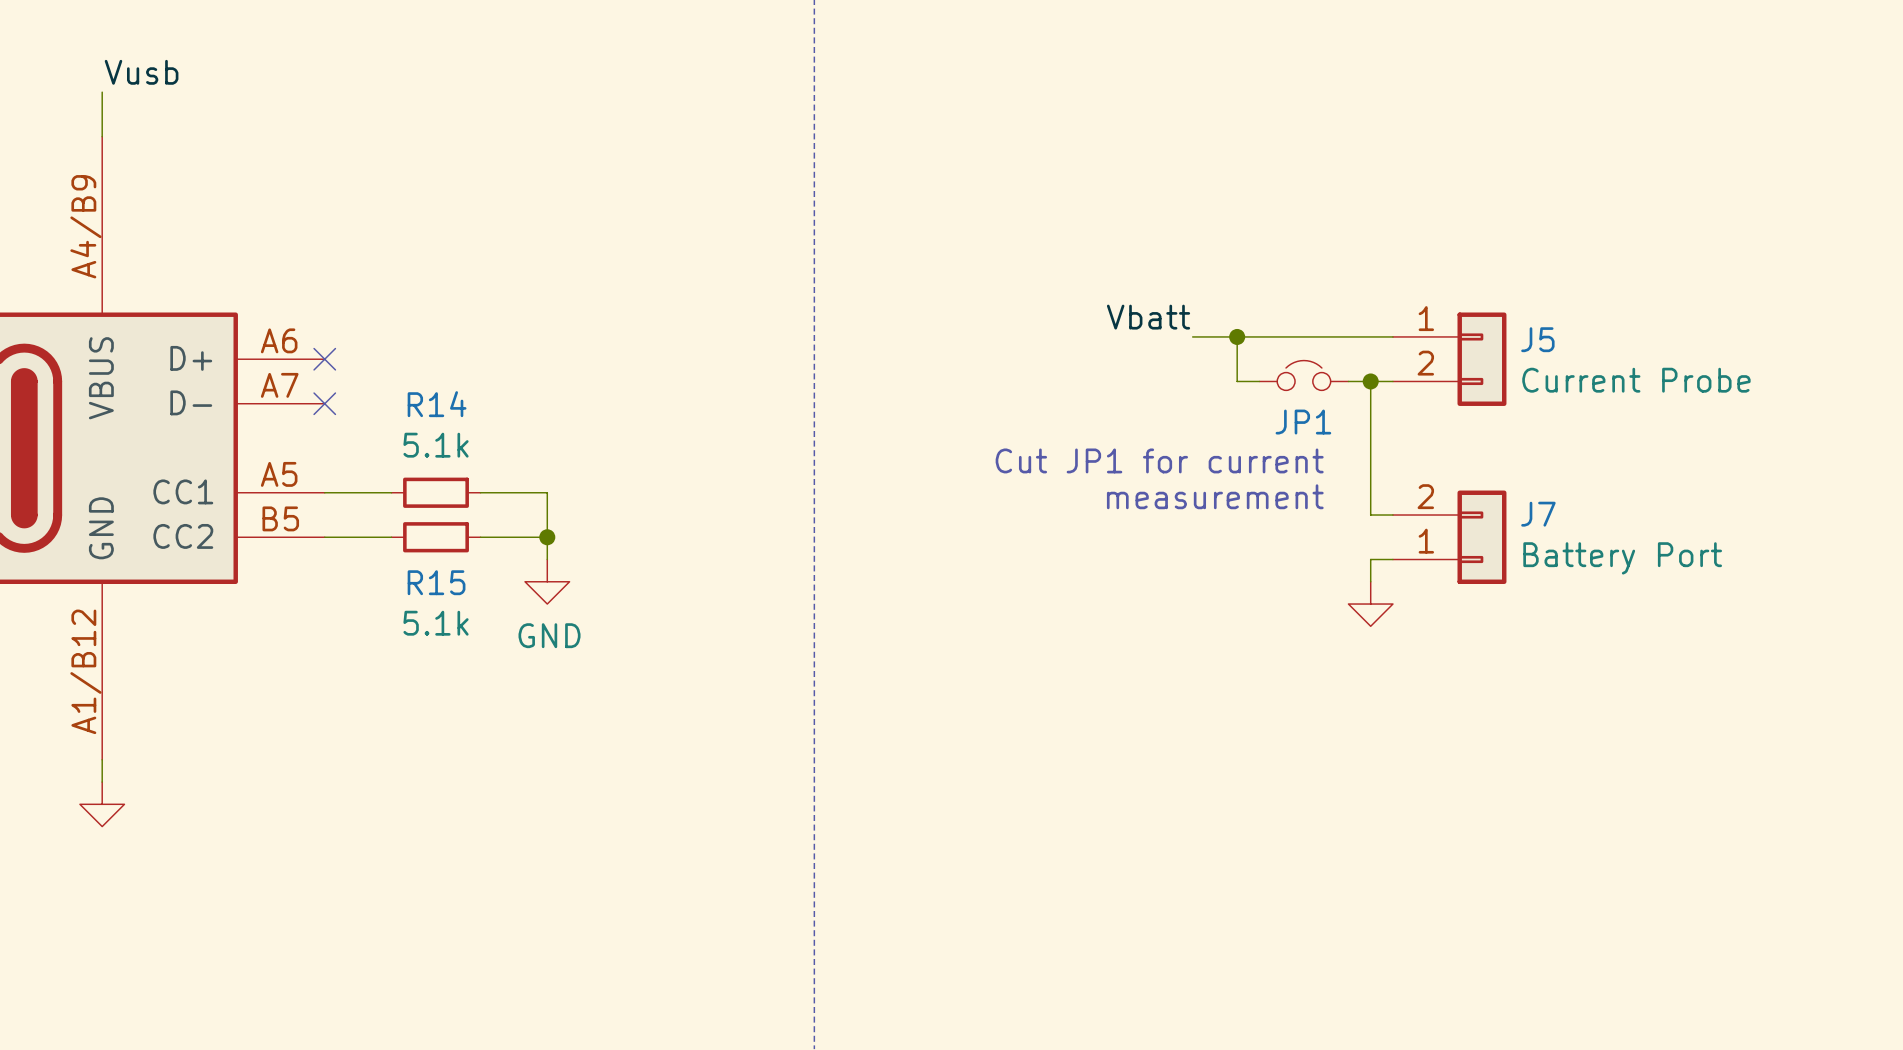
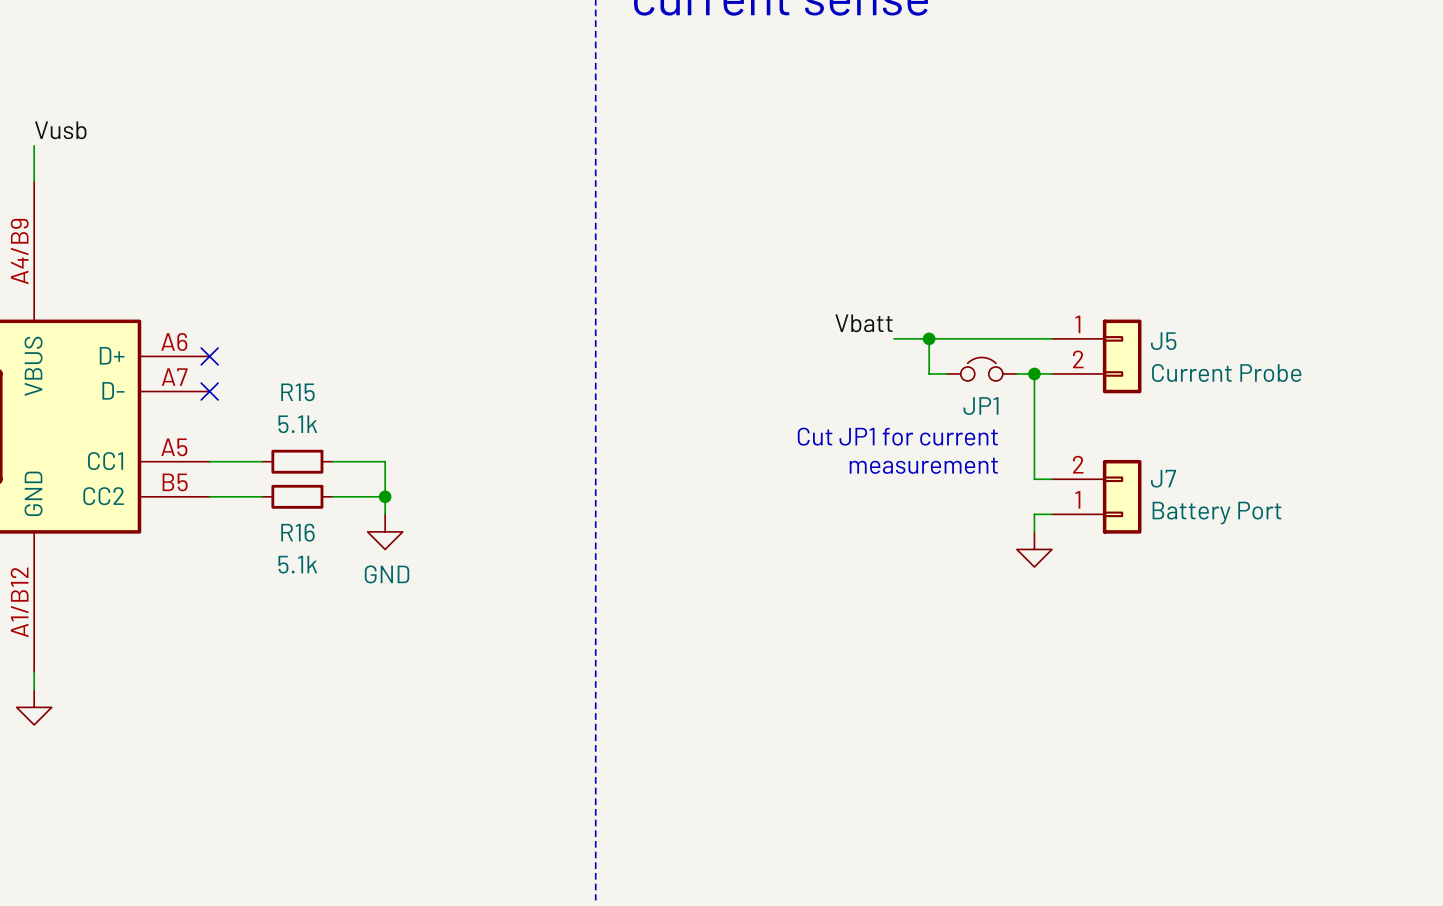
R14 name: R14 (437, 404) -> R15 (297, 392)
R15 name: R15 (436, 582) -> R16 (297, 532)

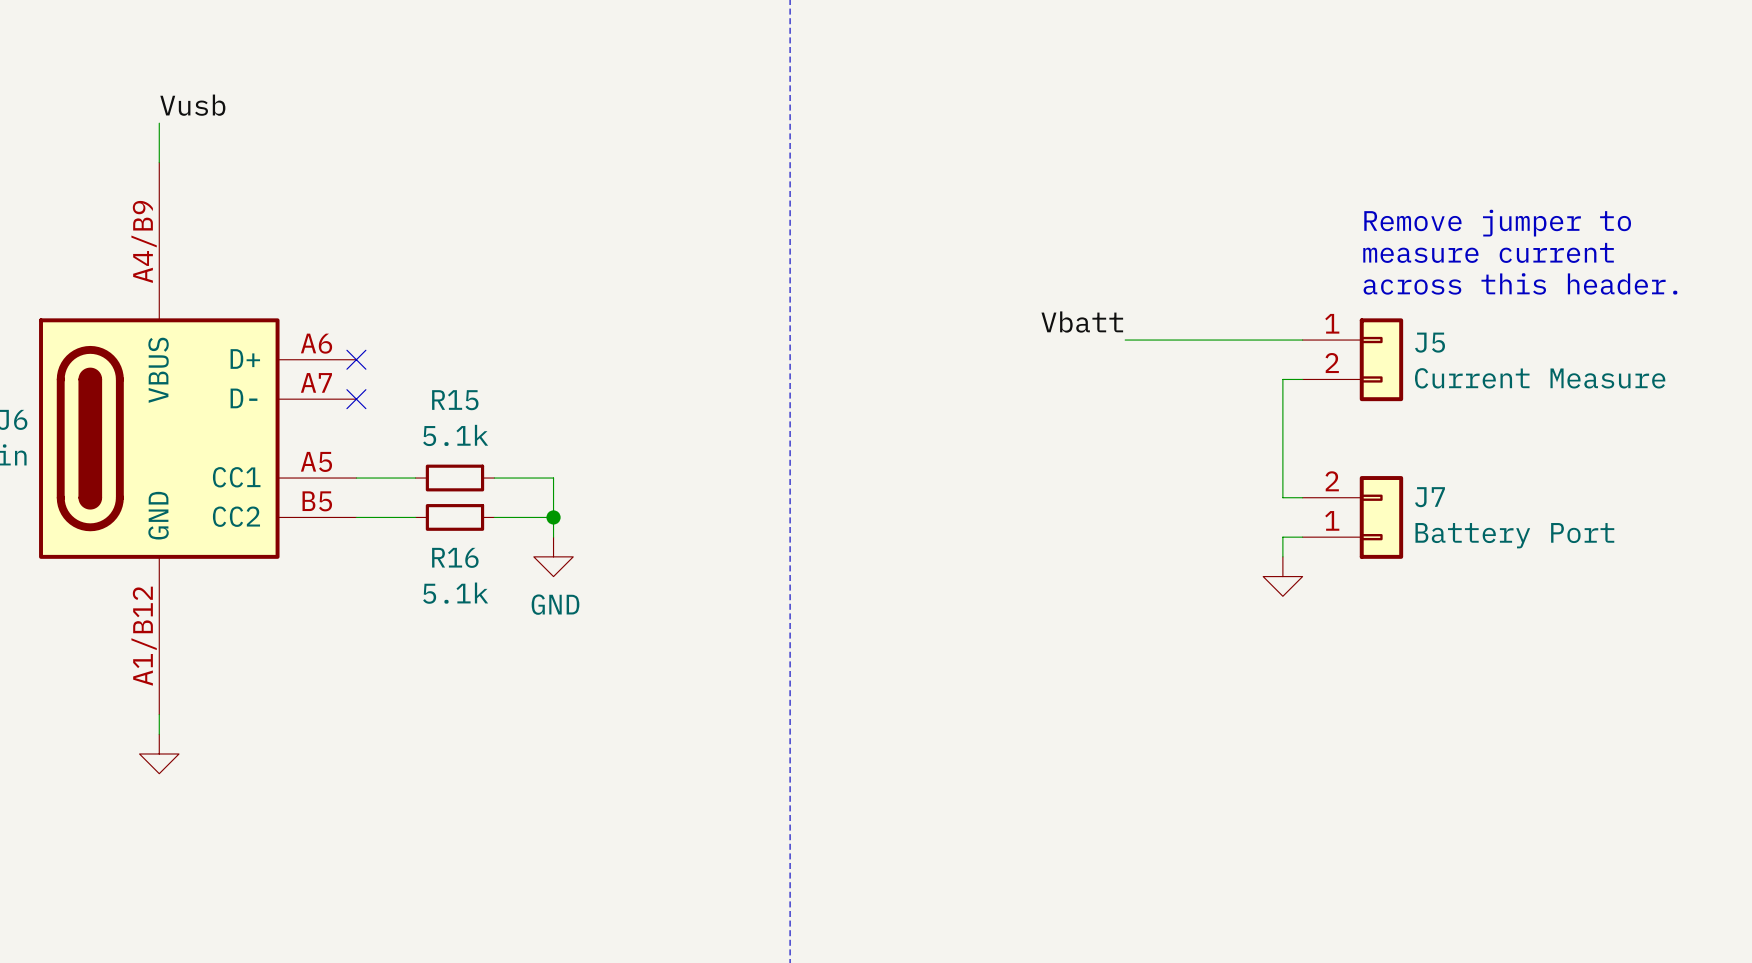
text: none -> Remove jumper to (1497, 223)
text: none -> measure current (1488, 252)
text: none -> across this header. (1520, 283)
wire: (929, 338) (929, 373) (946, 373) -> none
junction: (929, 338) -> none
JP1: (981, 369) -> none
J5 value: Current Probe (1226, 372) -> Current Measure (1540, 378)
wire: (1016, 373) (1034, 373) -> none
junction: (1034, 373) -> none
text: Cut JP1 for current (897, 436) -> none
text: measurement (923, 465) -> none

